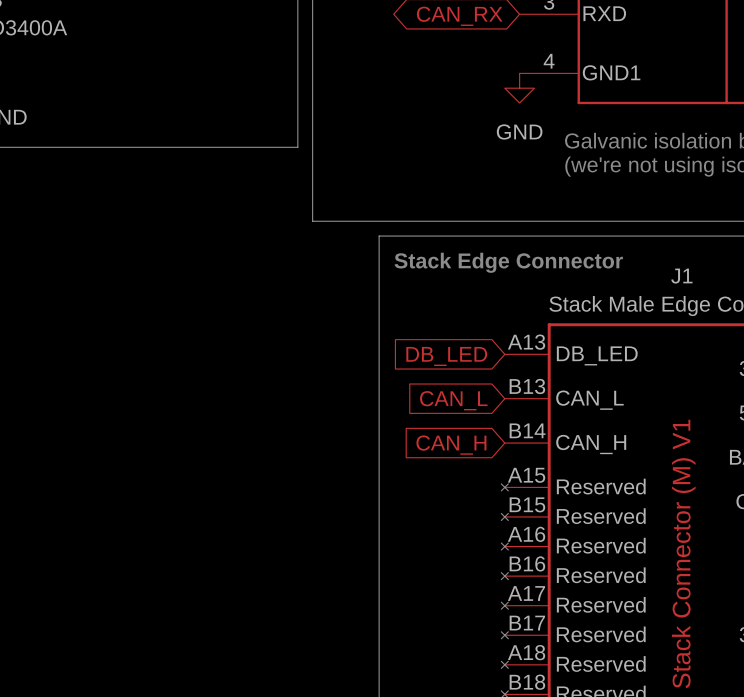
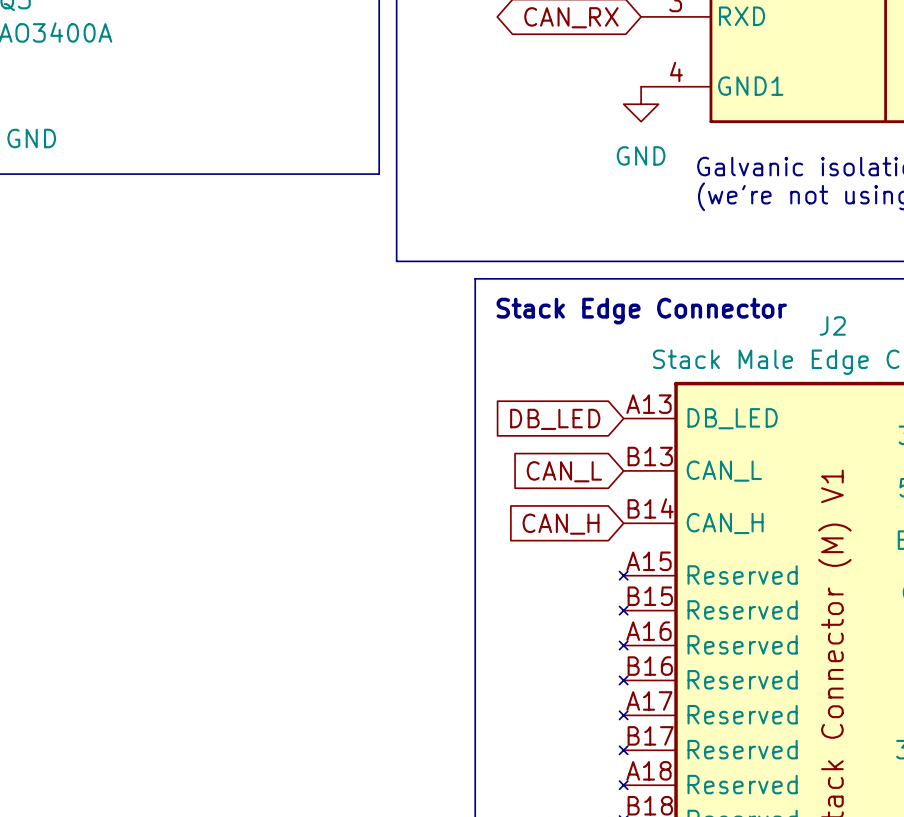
J1 name: J1 (681, 276) -> J2 (832, 325)

